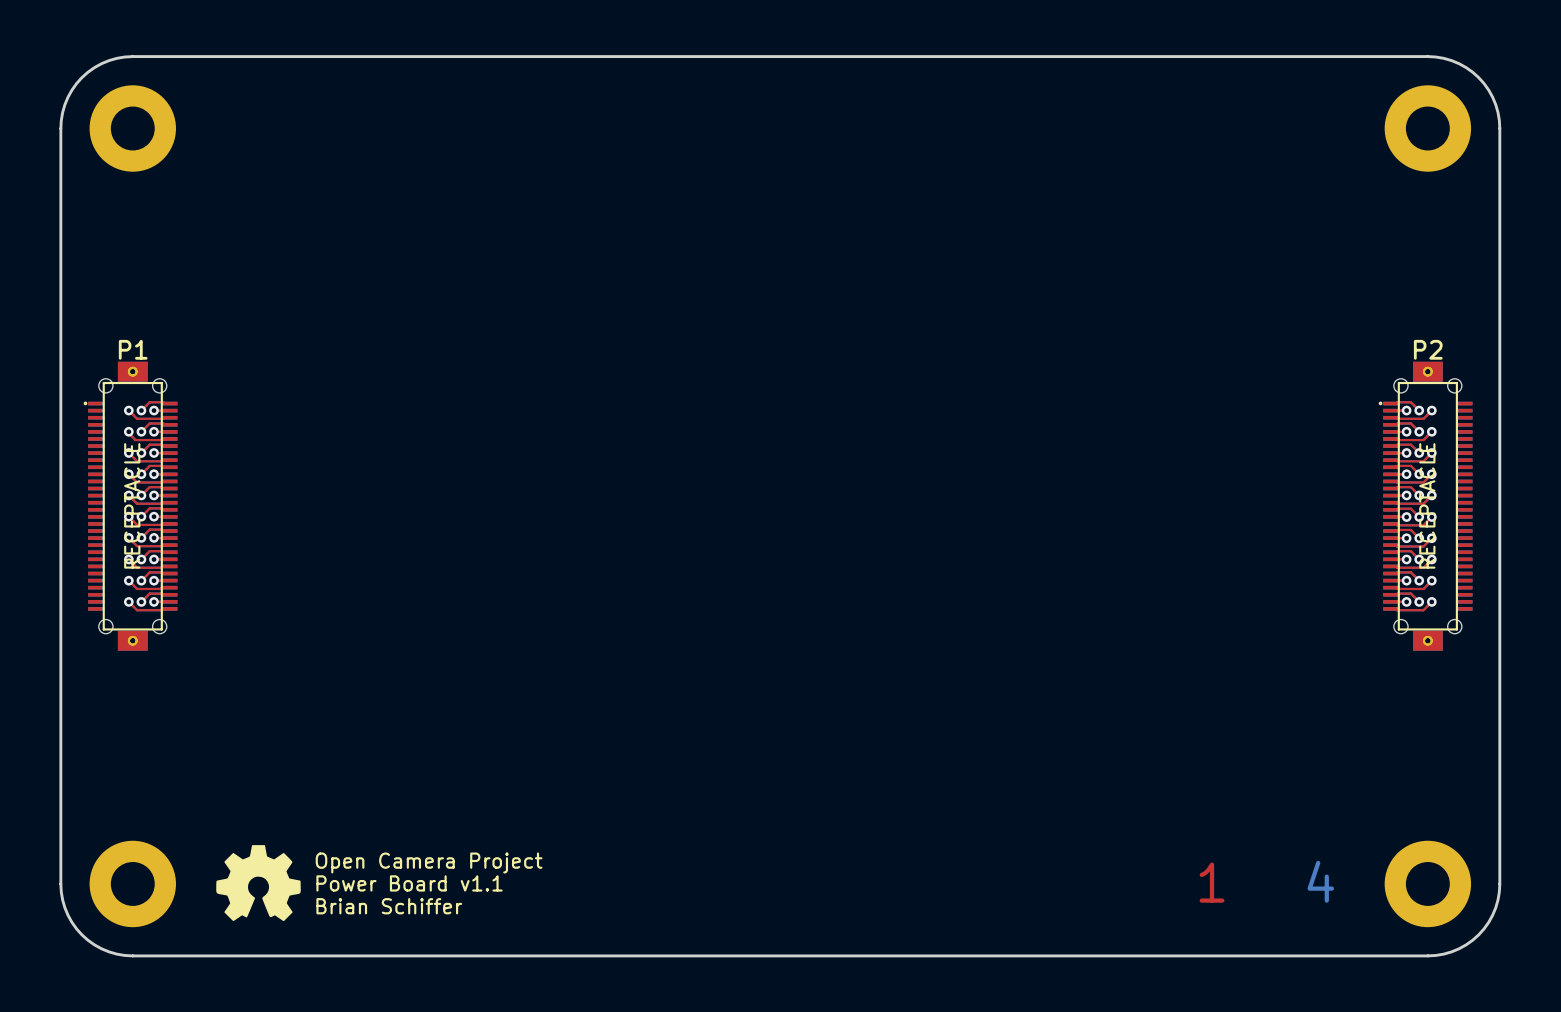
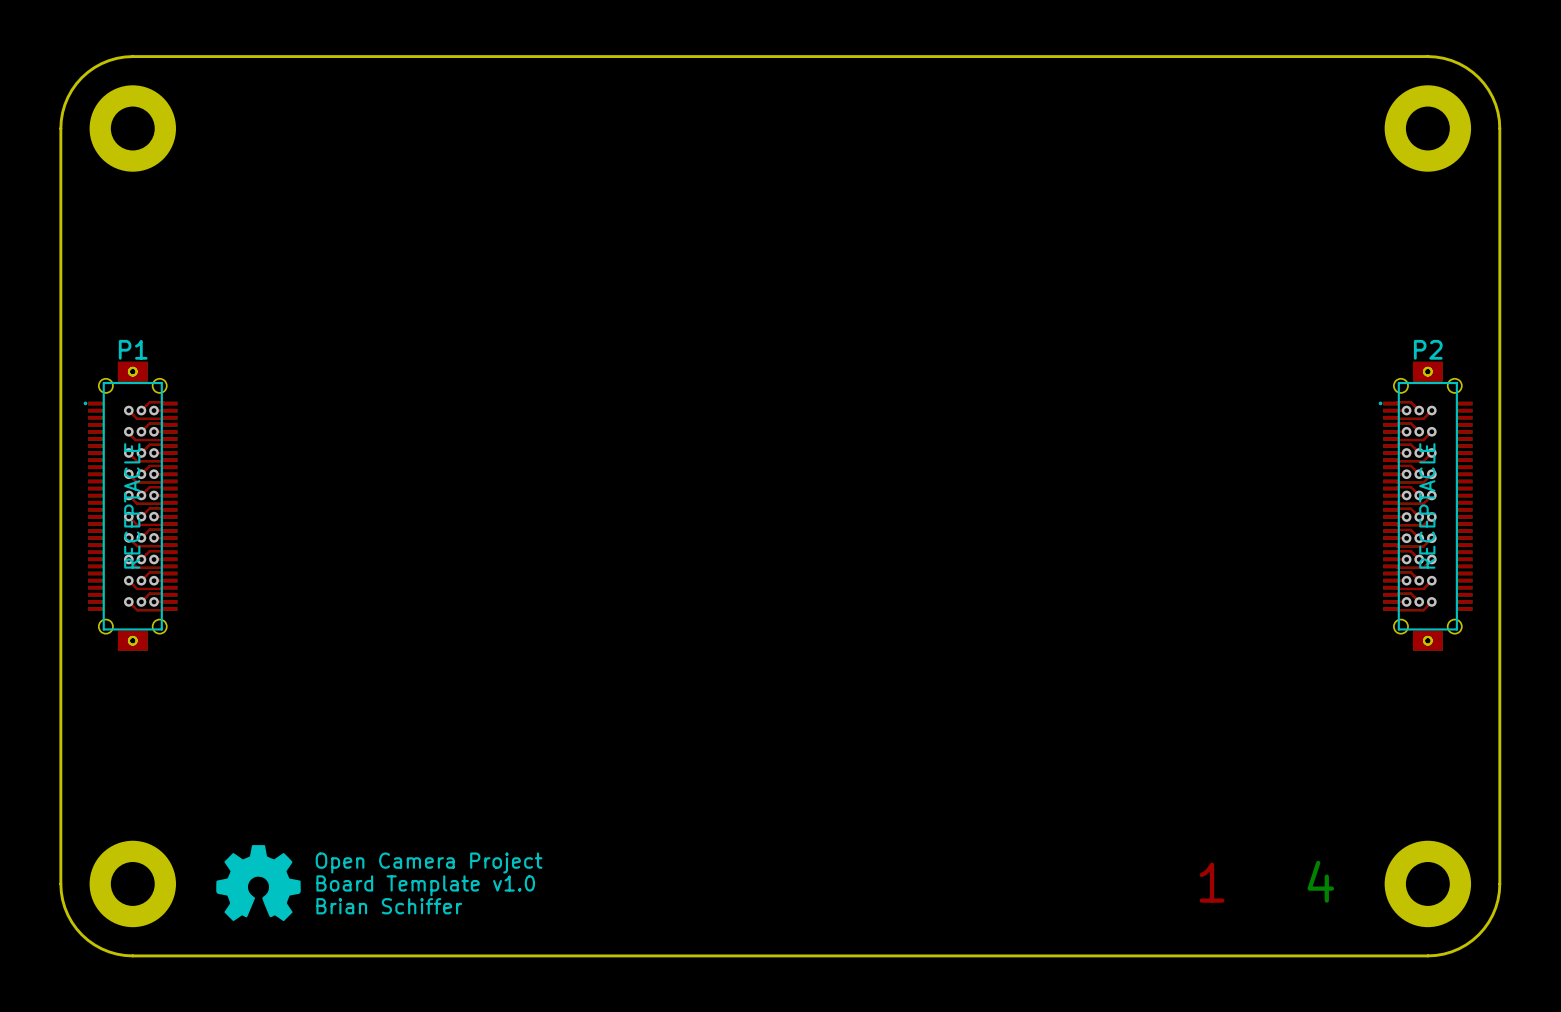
text: Power Board v1.1 (409, 883) -> Board Template v1.0 (425, 885)

